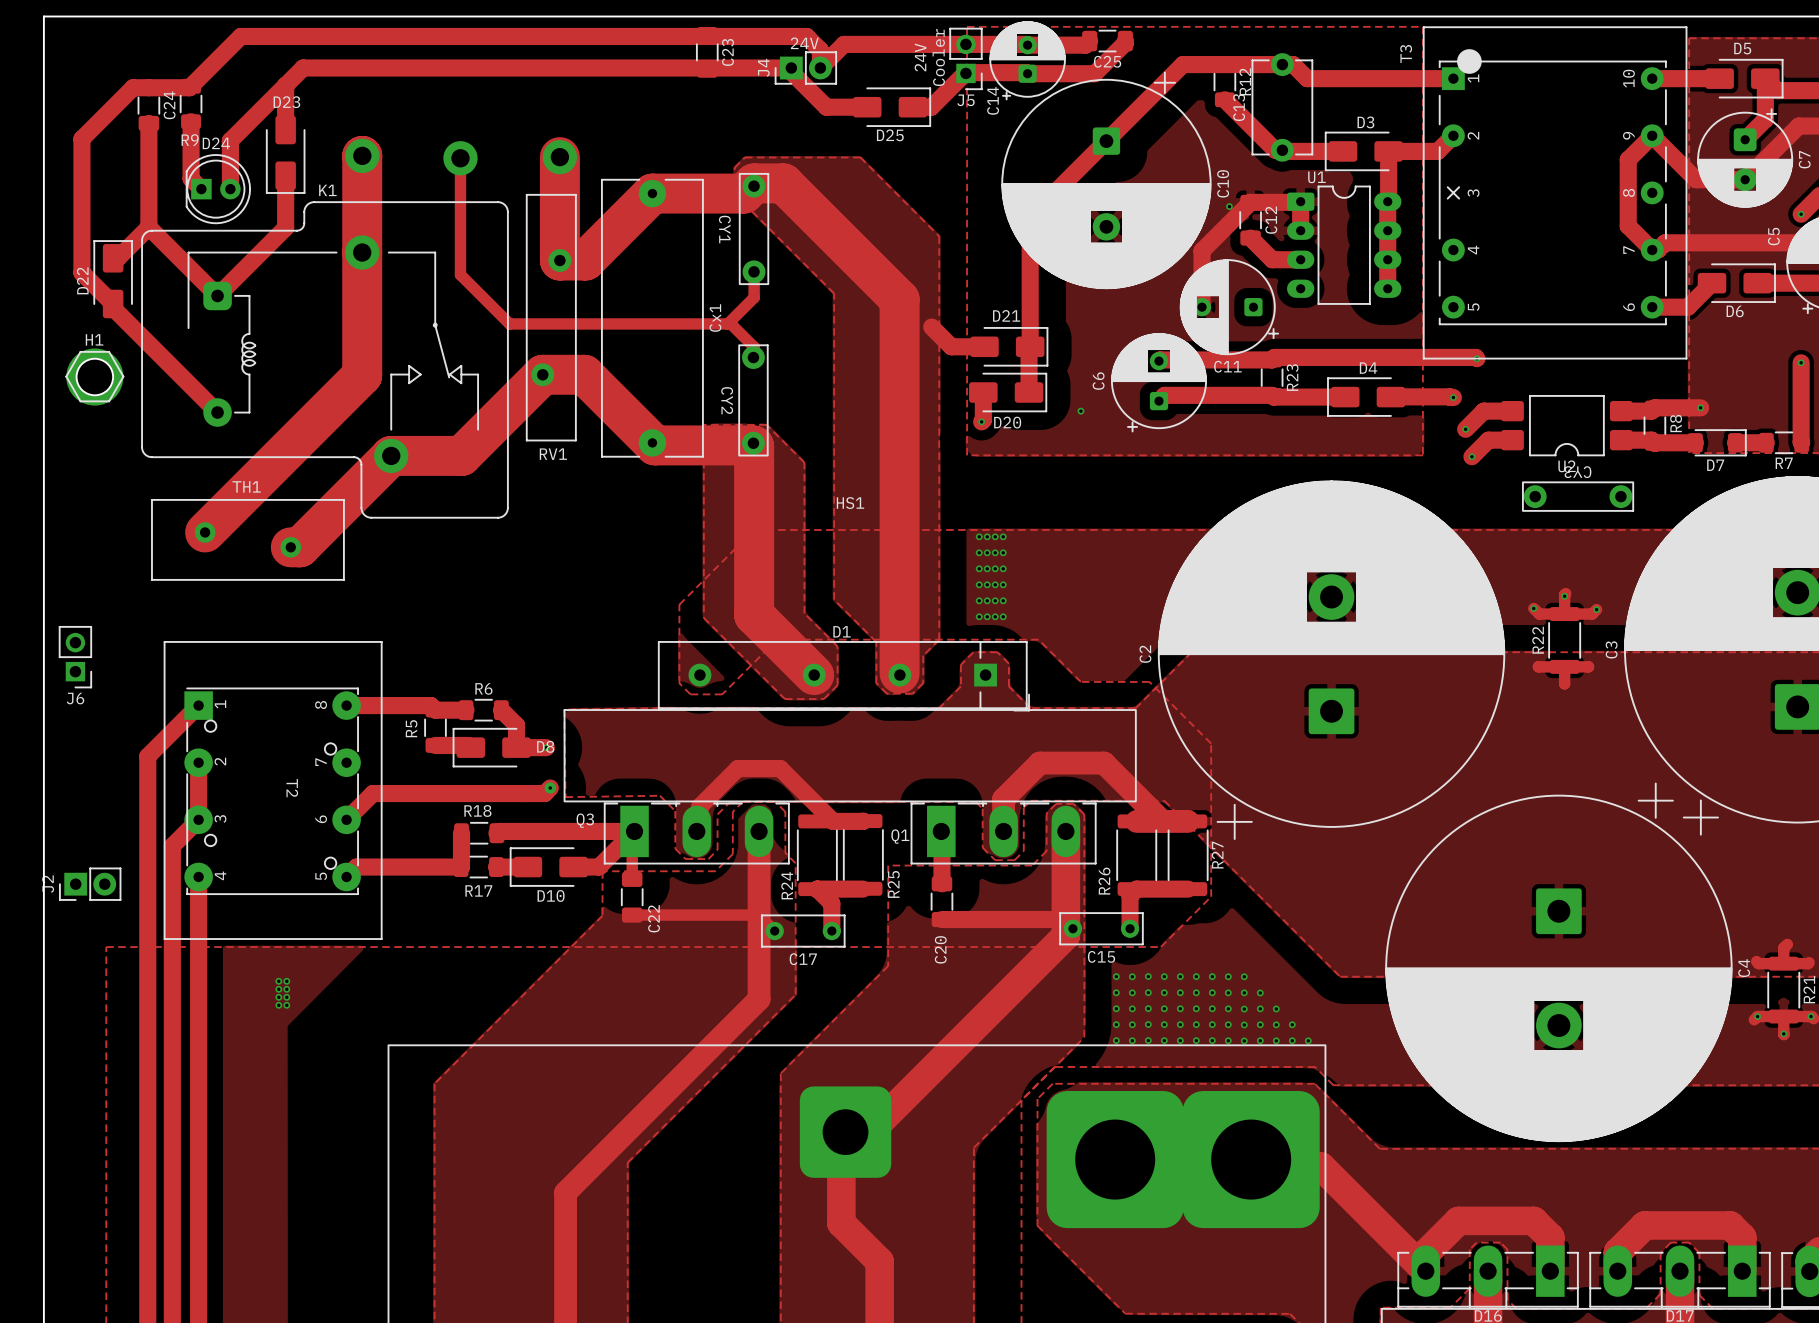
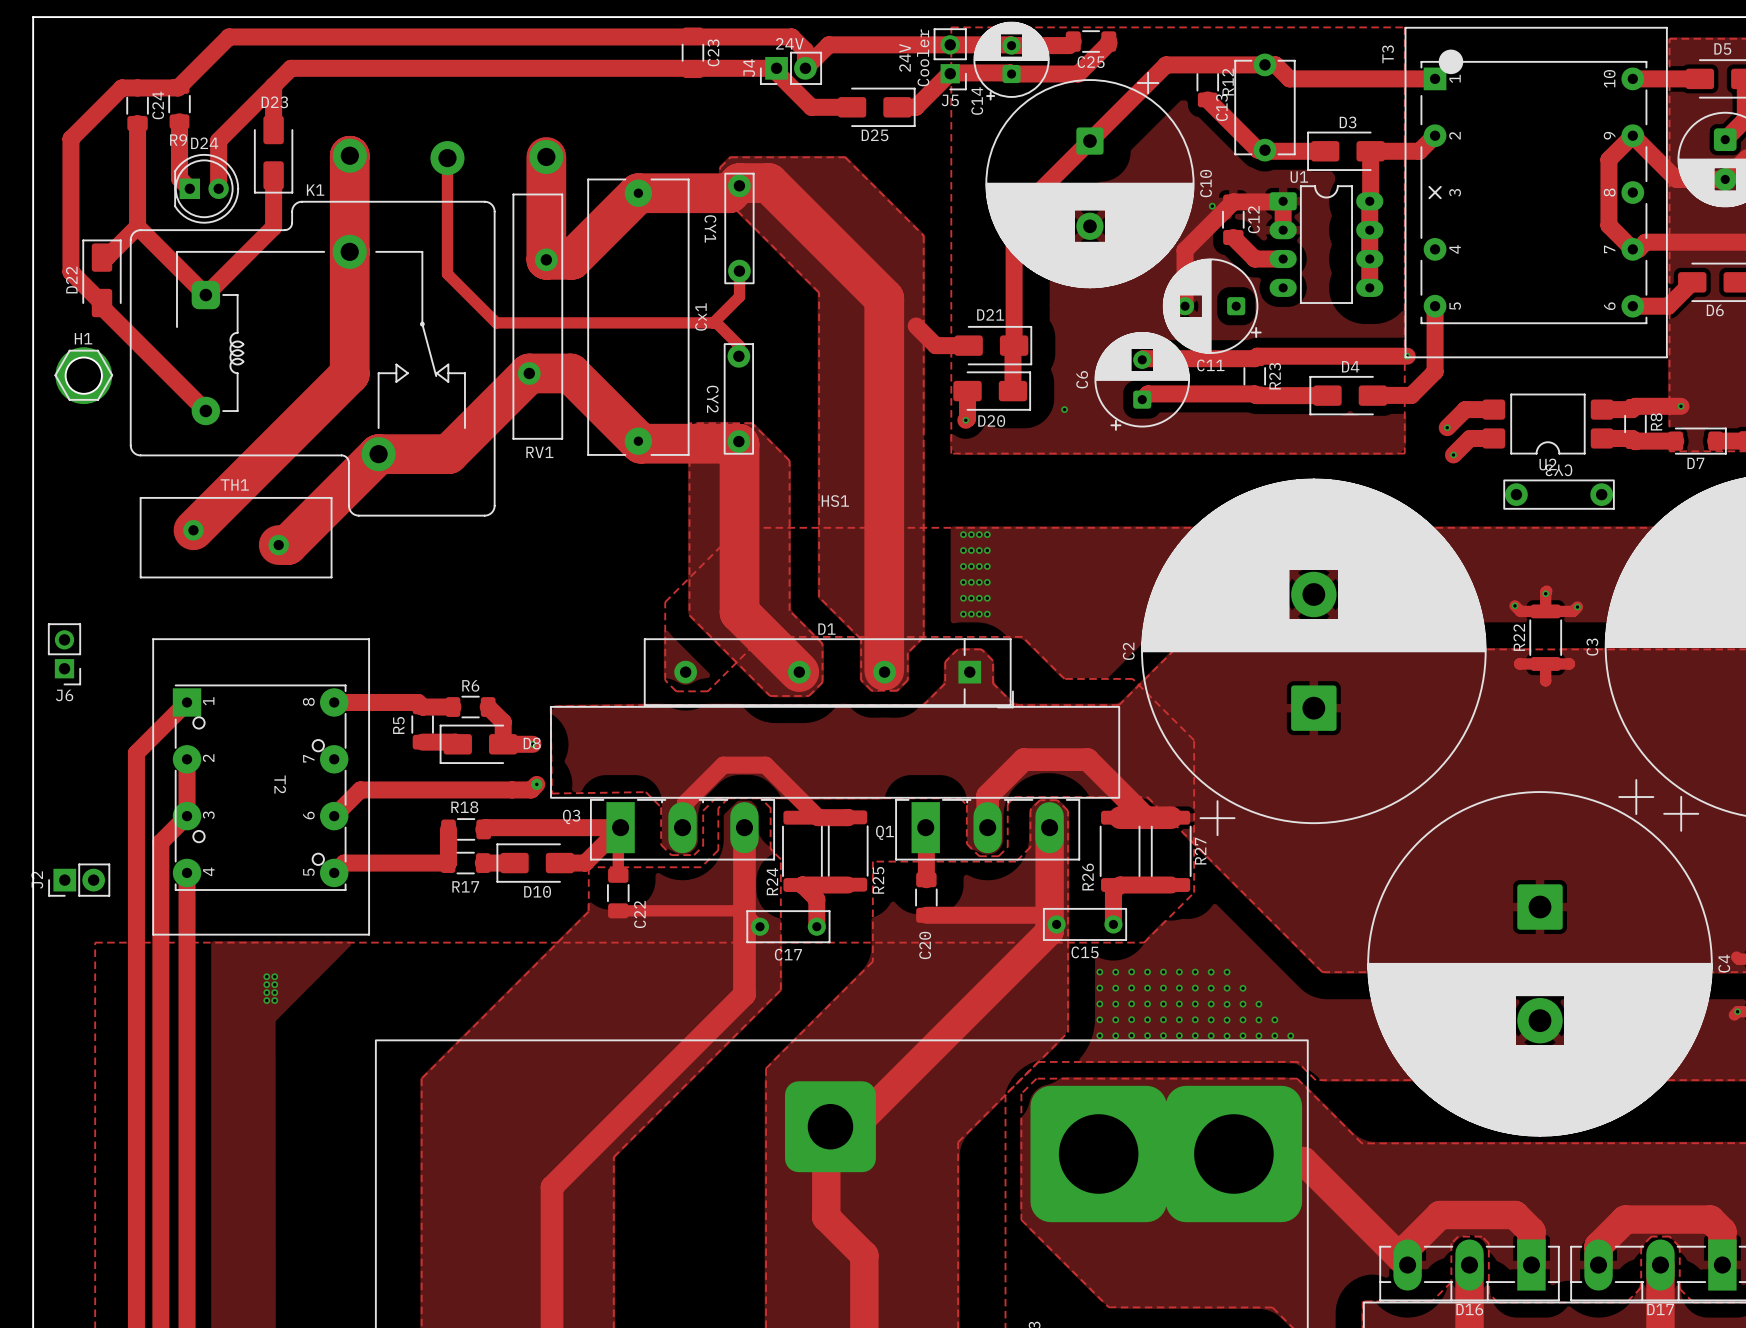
track: (1425, 357) (1476, 358) -> none
via: none -> (1407, 356)
via: (1476, 358) -> none
track: (1429, 396) (1453, 397) -> (1411, 395) (1435, 371) (1435, 306)
via: (1453, 397) -> none

